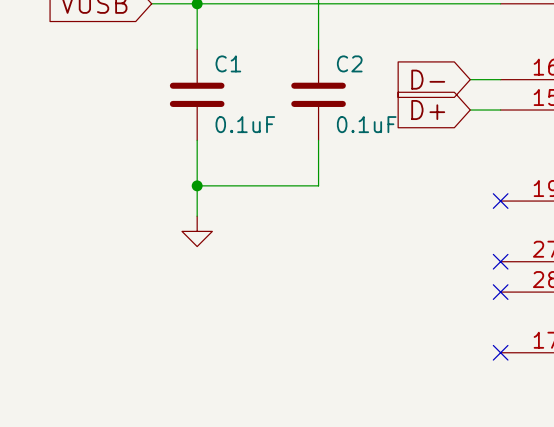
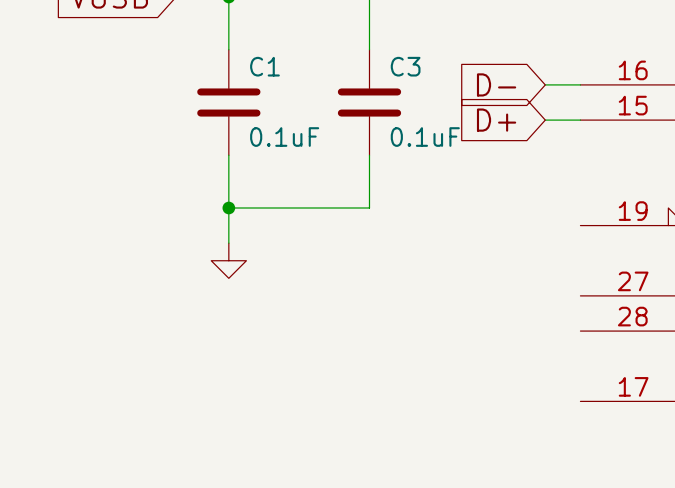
C2 name: C2 (349, 63) -> C3 (405, 66)
no-connect mark: (500, 201) -> none
no-connect mark: (500, 261) -> none
no-connect mark: (500, 292) -> none
no-connect mark: (500, 352) -> none

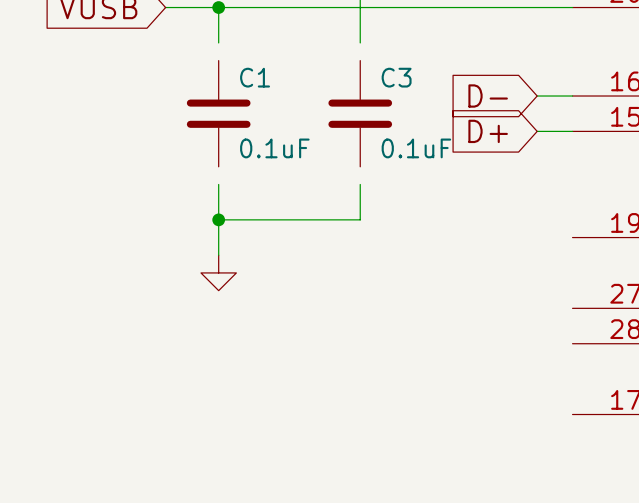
wire: (228, 32) (228, 49) -> none
wire: (369, 32) (369, 49) -> none
wire: (228, 155) (228, 172) -> none
wire: (369, 155) (369, 172) -> none

